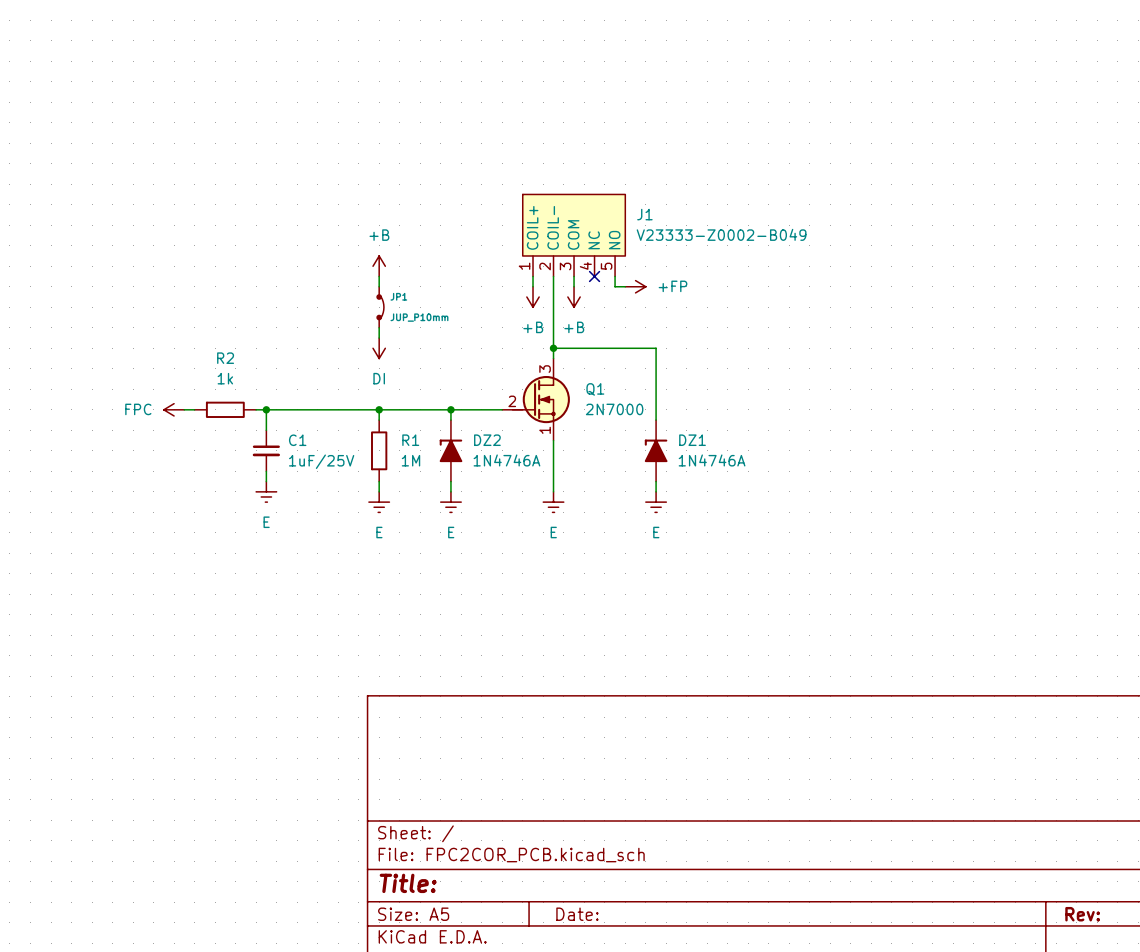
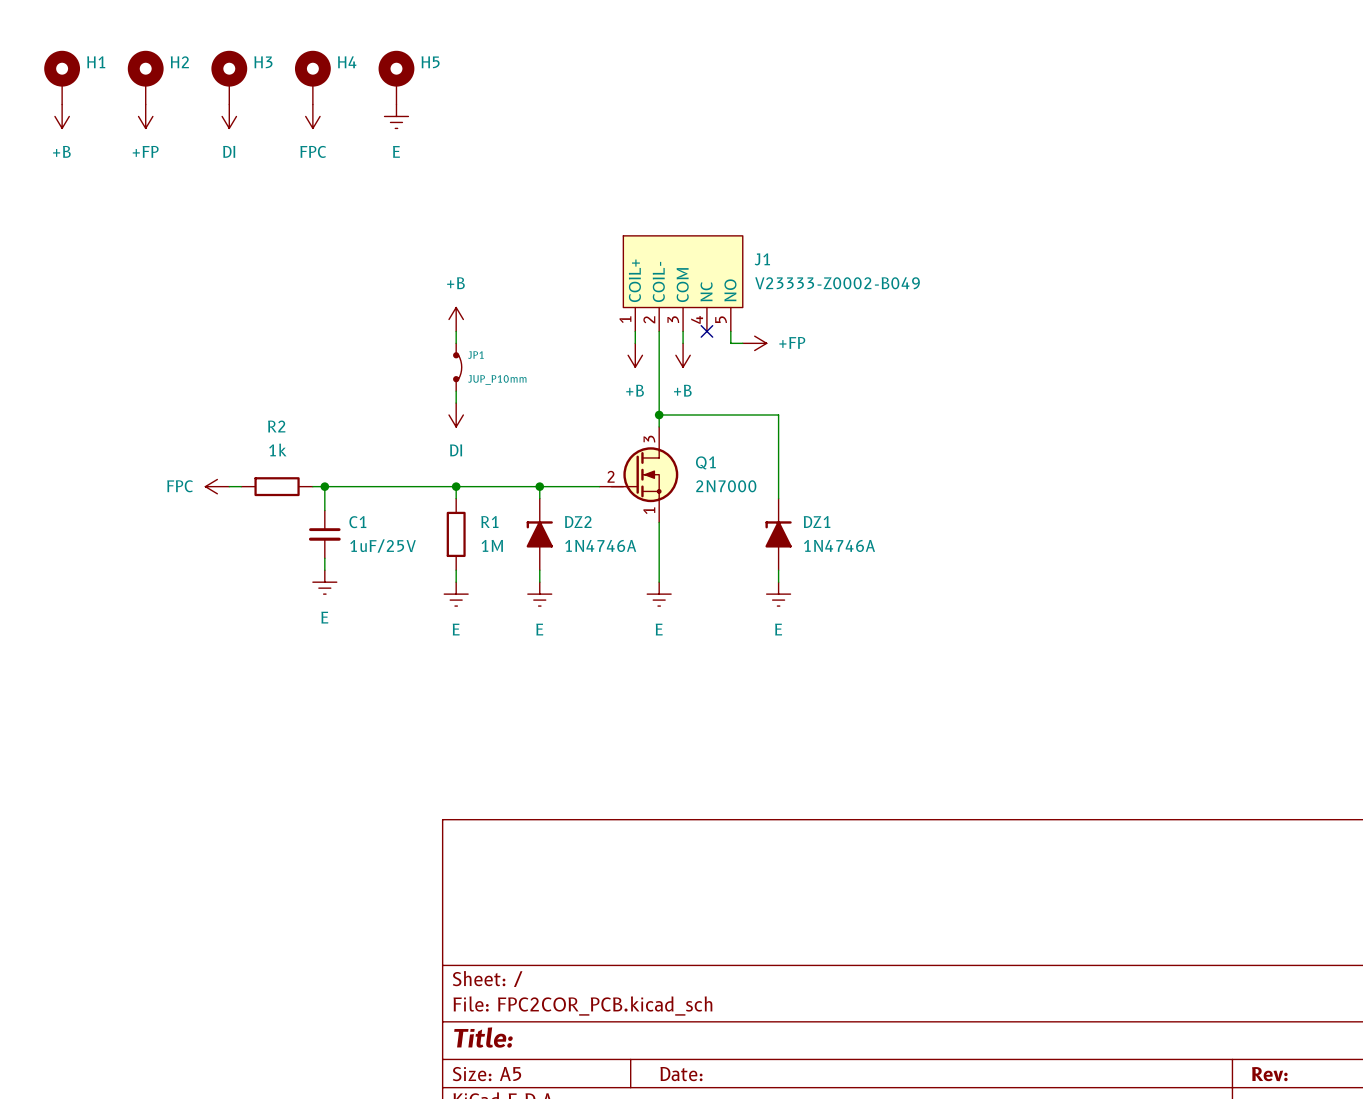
H1: none -> (62, 77)
H2: none -> (145, 77)
H3: none -> (229, 77)
H4: none -> (312, 77)
H5: none -> (396, 77)
power symbol: none -> +B (62, 116)
power symbol: none -> +FP (145, 116)
power symbol: none -> DI (229, 116)
power symbol: none -> FPC (312, 116)
power symbol: none -> E (396, 116)

